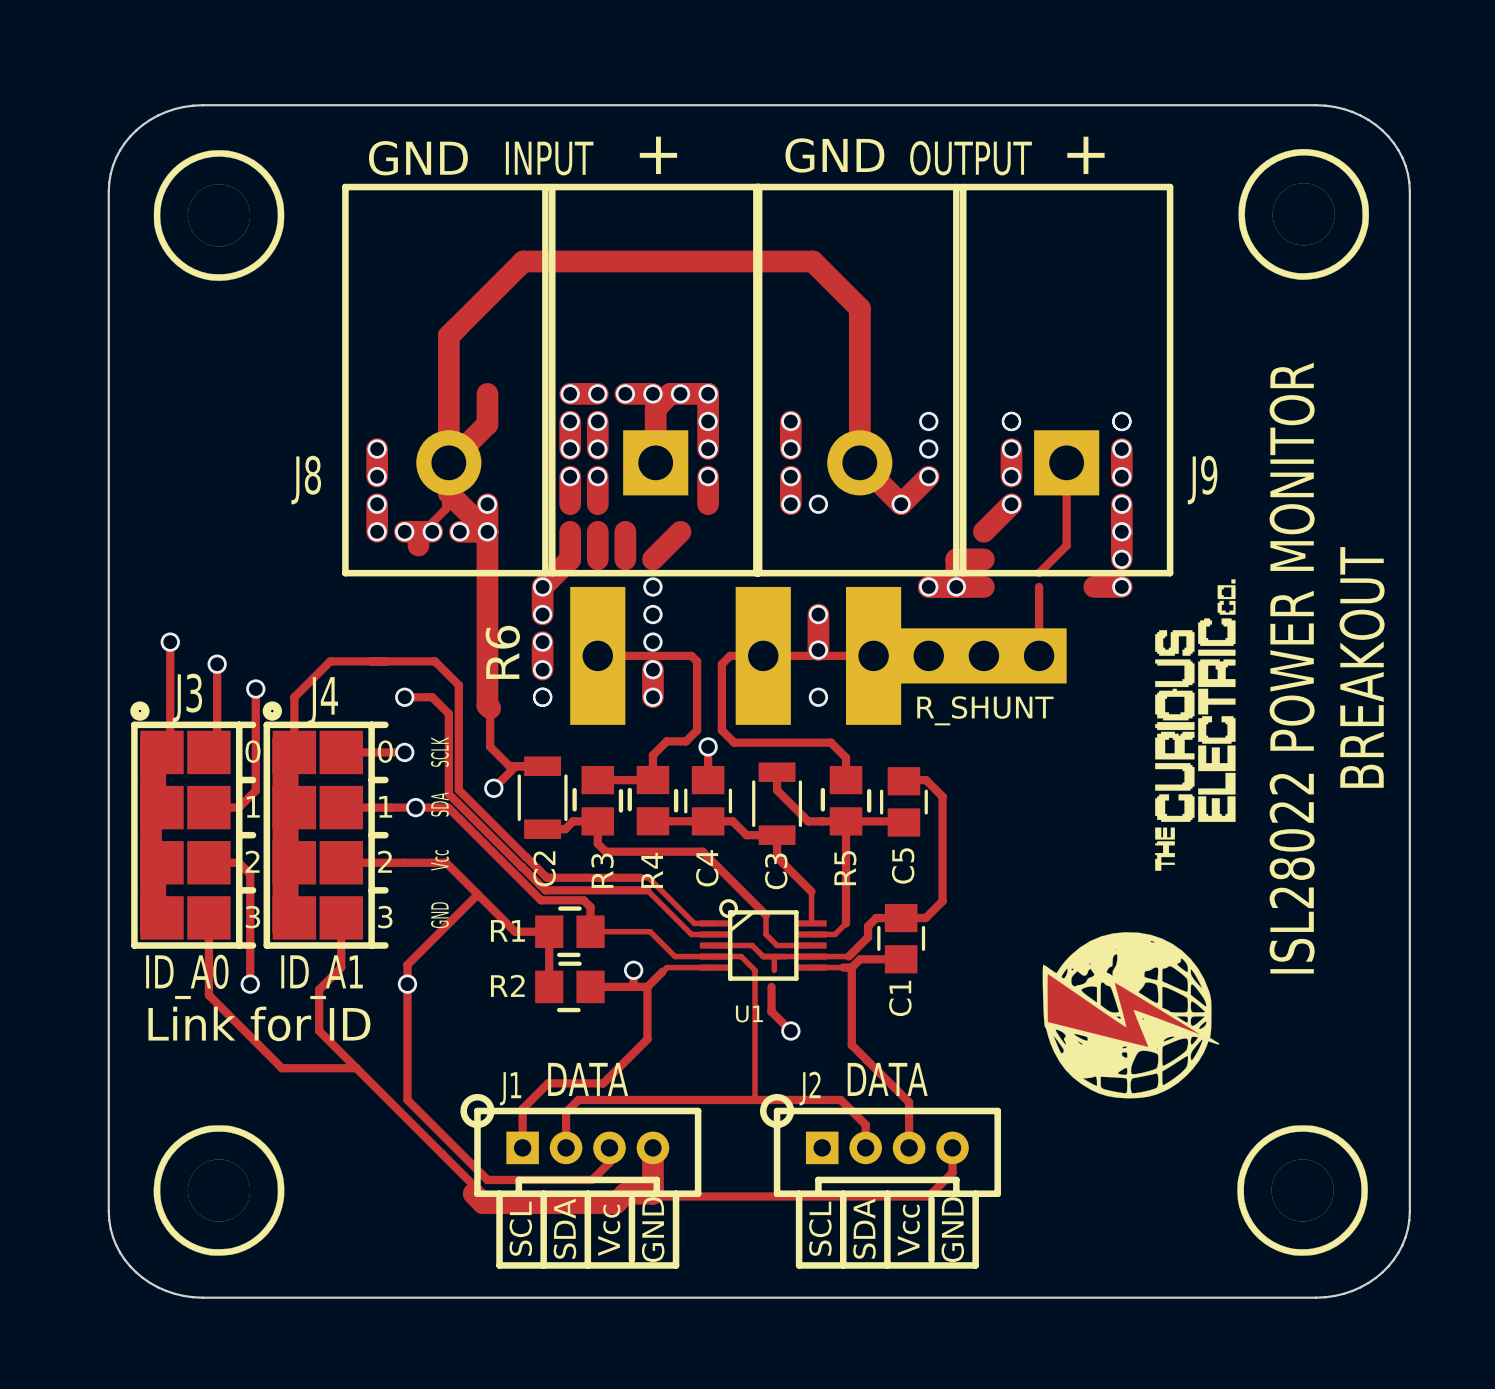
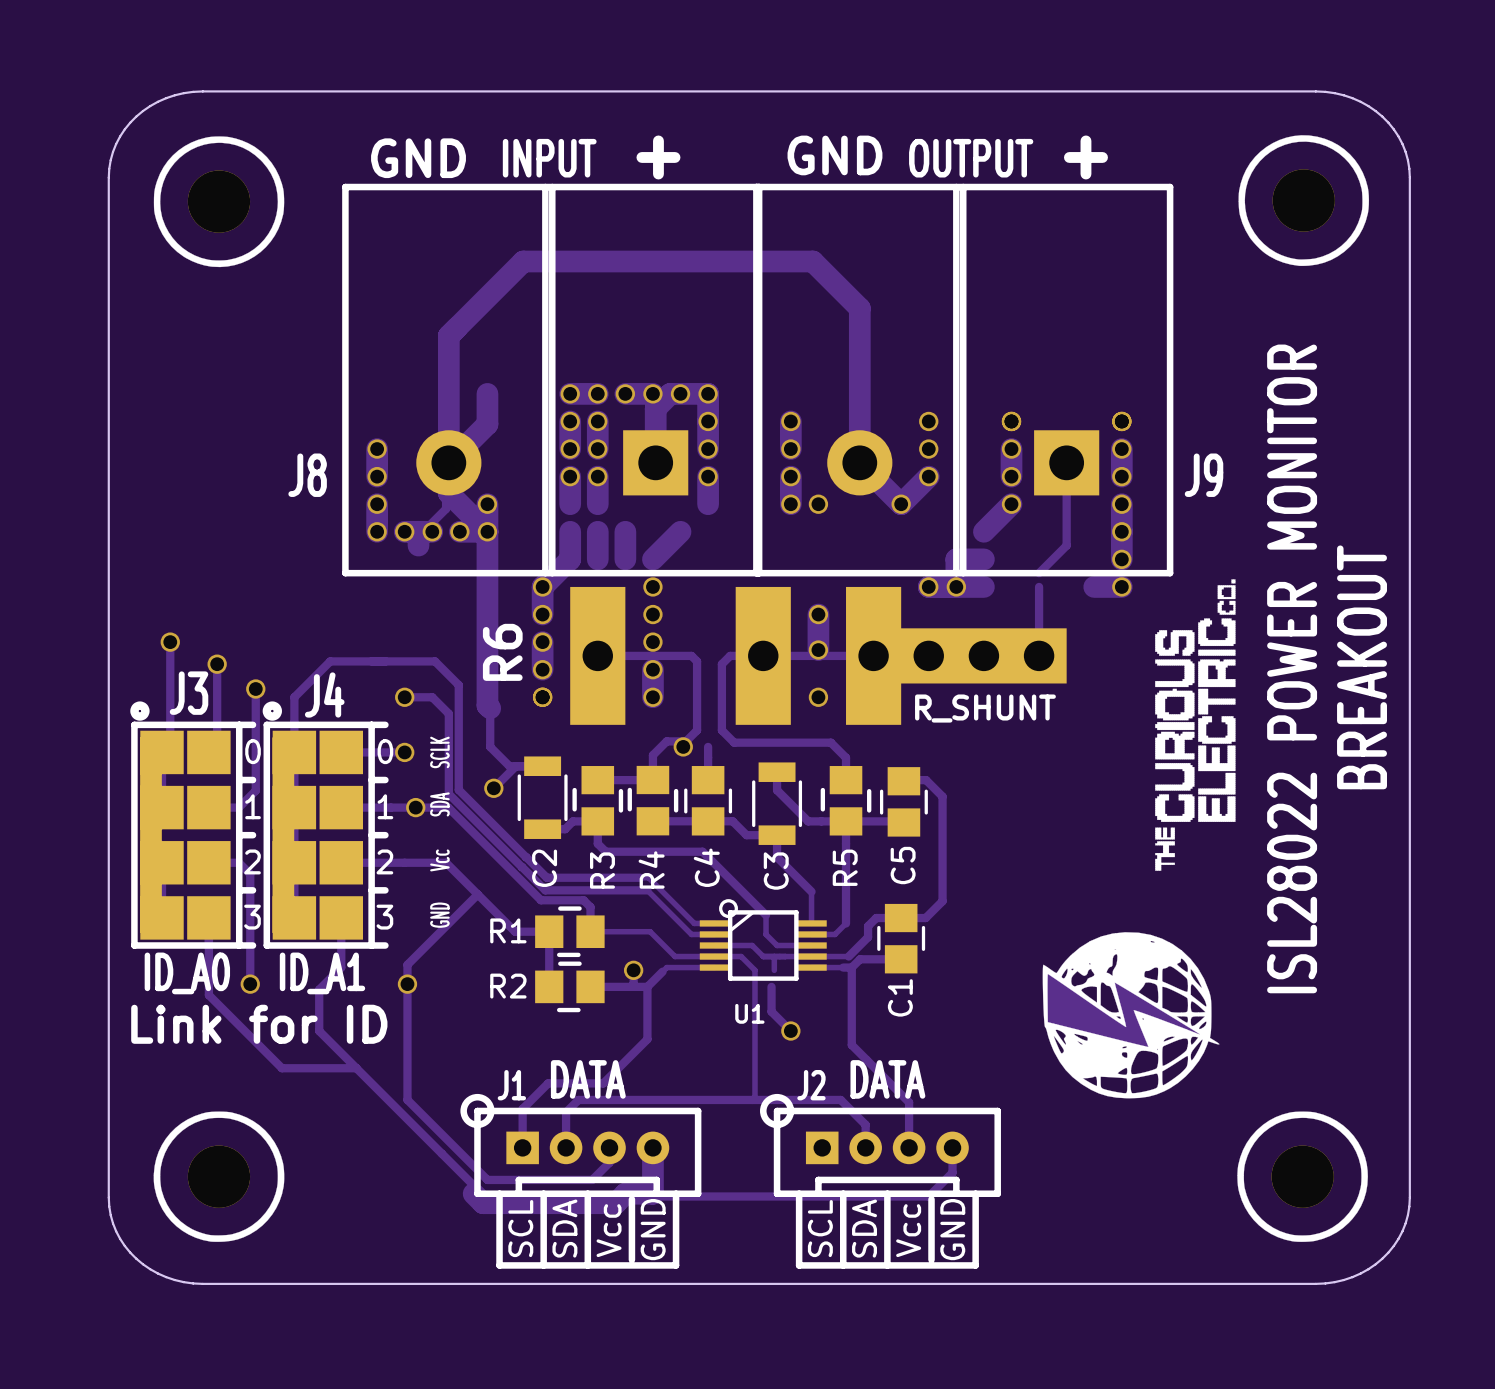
part position: (759, 701) -> (759, 687)
via position: (708, 746) -> (683, 746)

